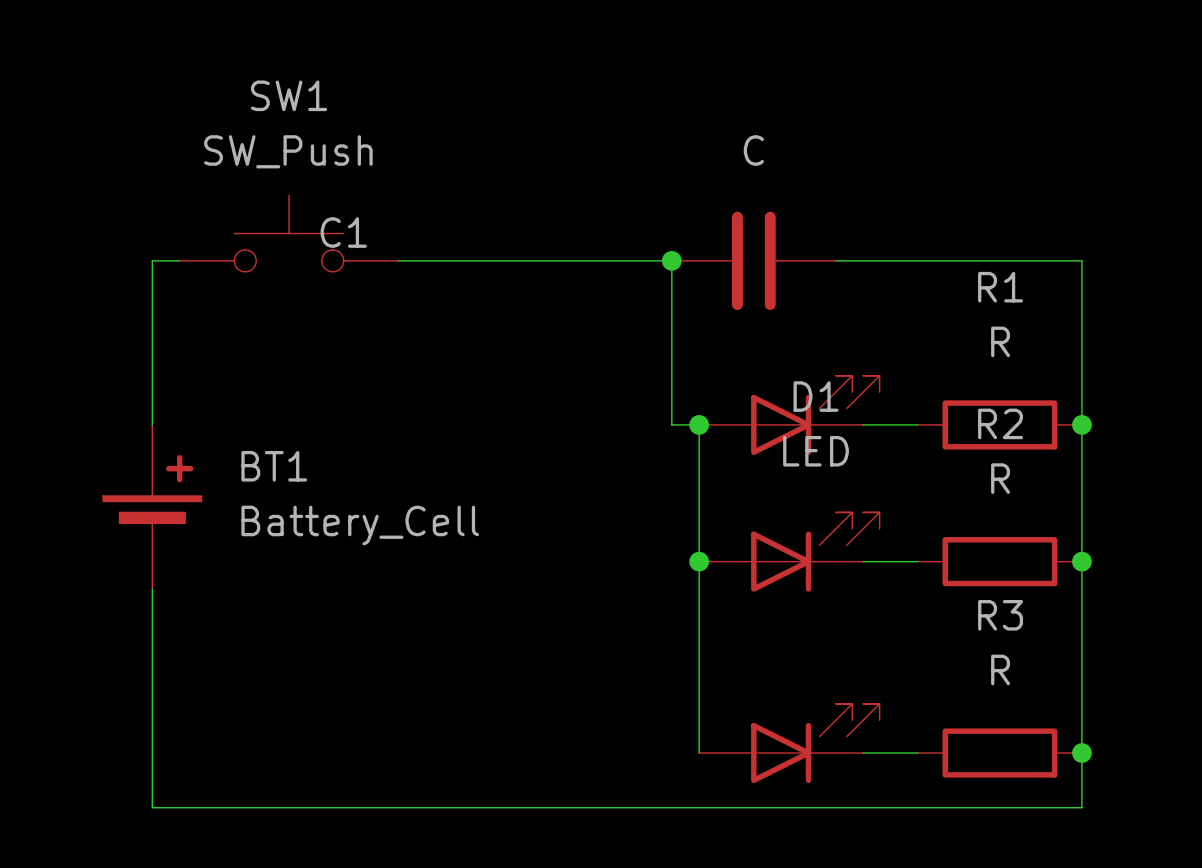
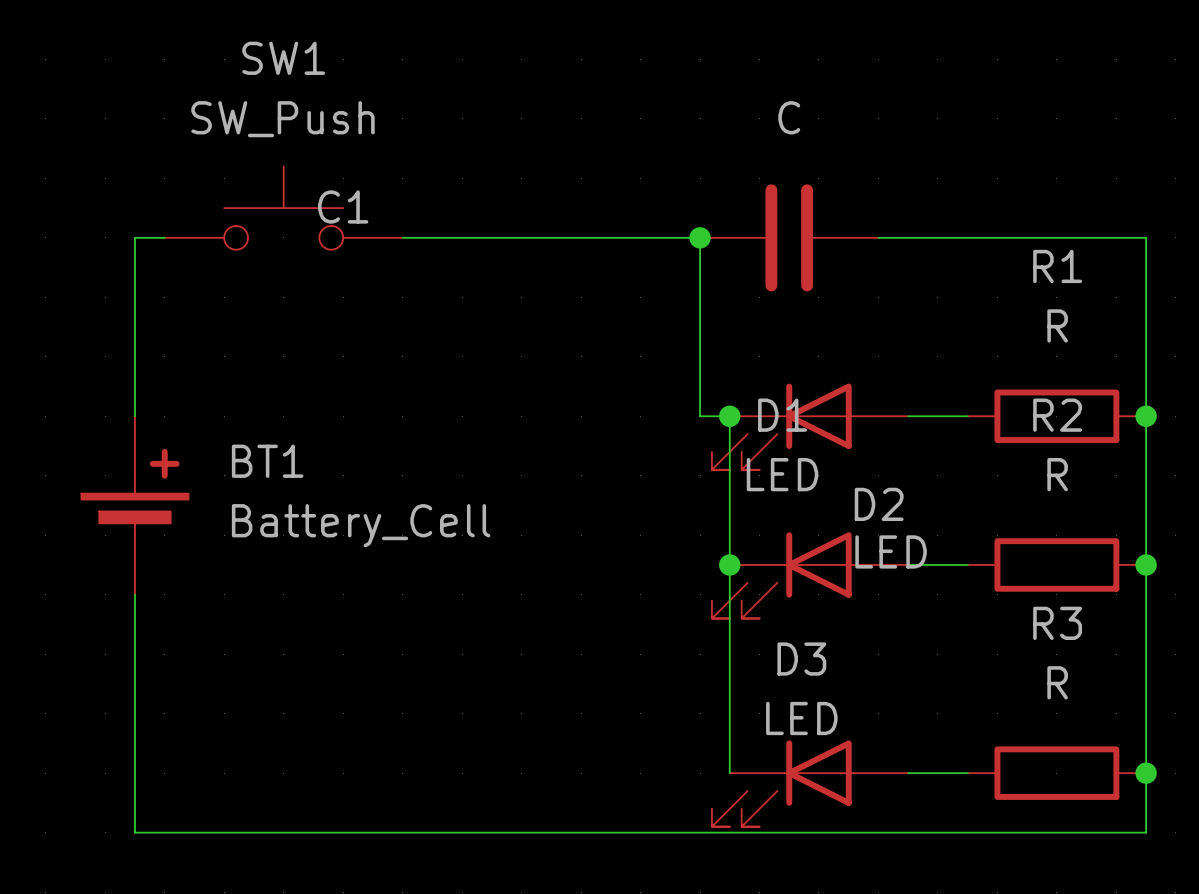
D1 name position: D1 (816, 396) -> D1 (782, 415)
part: (789, 415) -> none
D3: none -> LED (810, 426)
D1 value position: LED (816, 451) -> LED (782, 474)
D1 rotation: 0° (815, 552) -> 180° (781, 575)
part: (789, 743) -> none
D2: none -> LED (810, 783)

